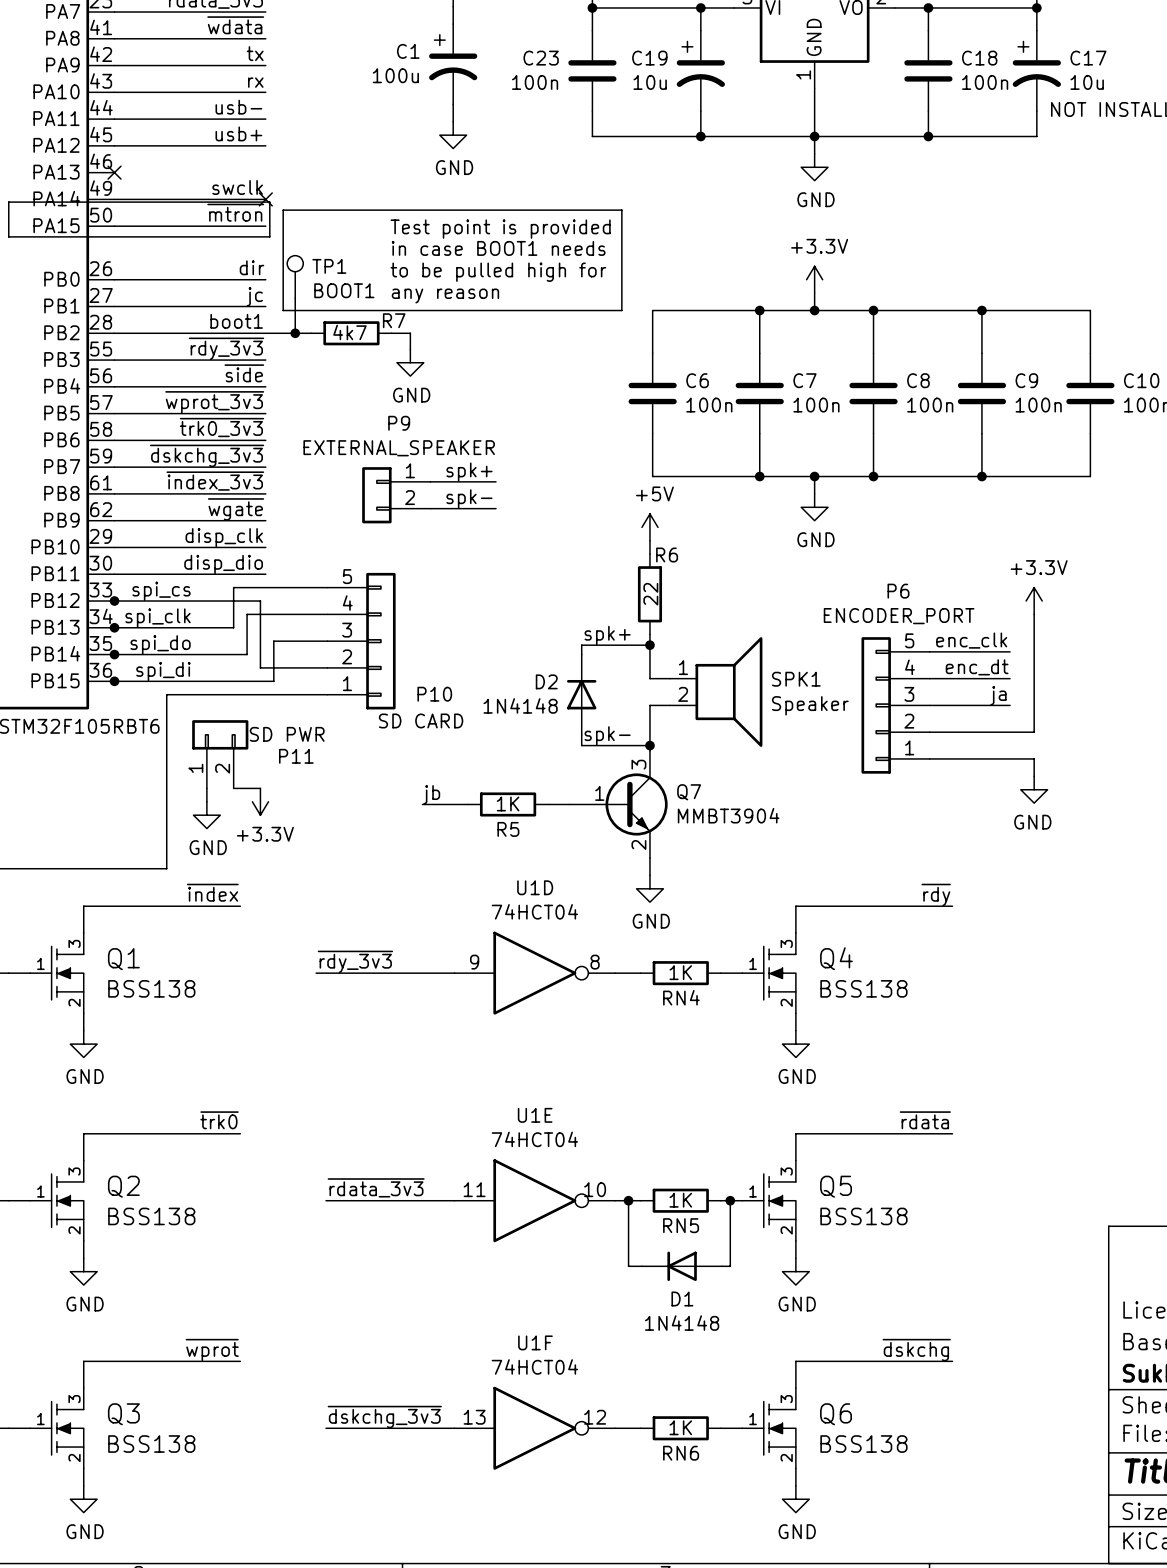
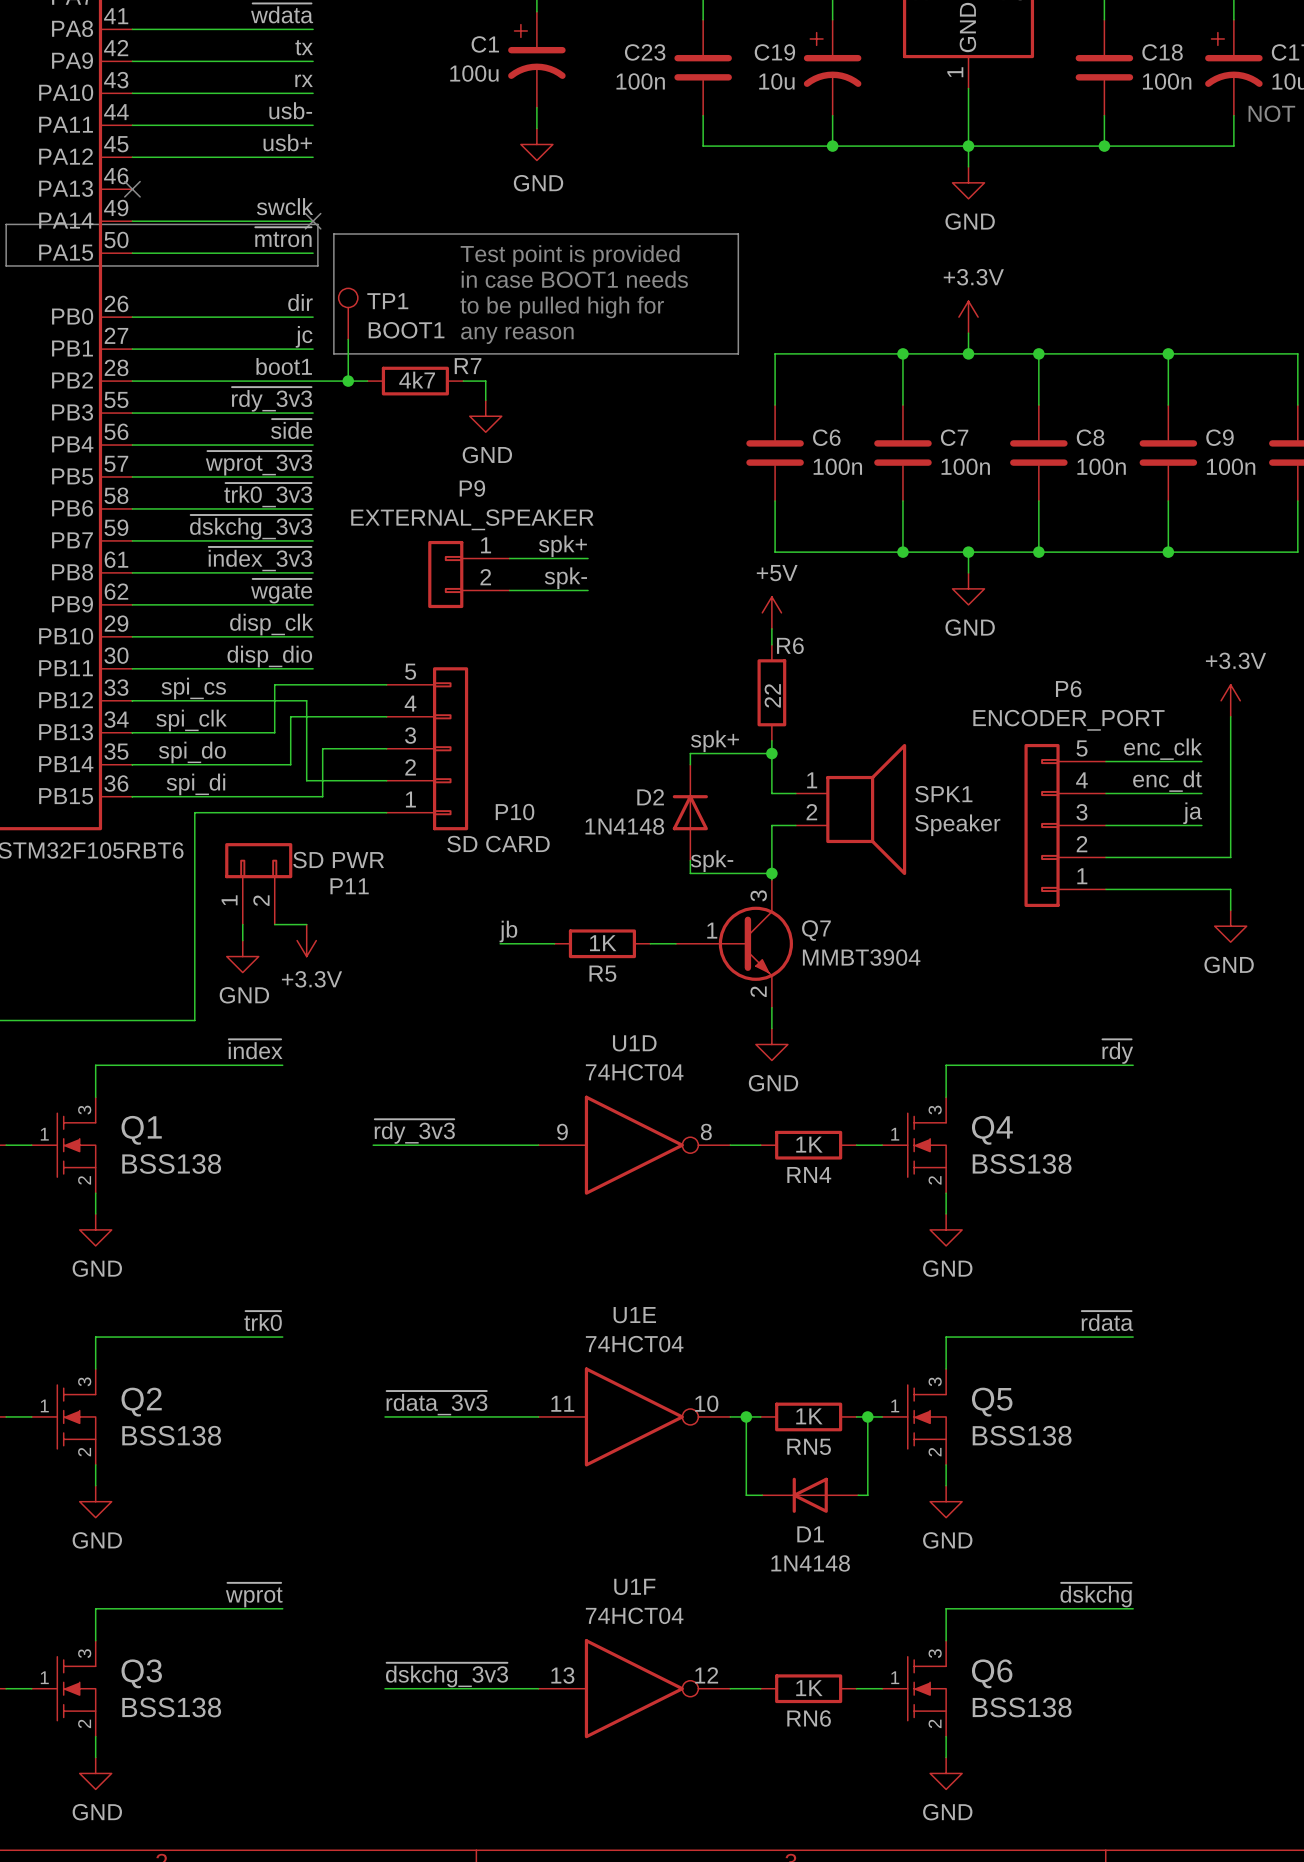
junction: (114, 601) -> none
junction: (114, 627) -> none
junction: (114, 654) -> none
junction: (114, 681) -> none

